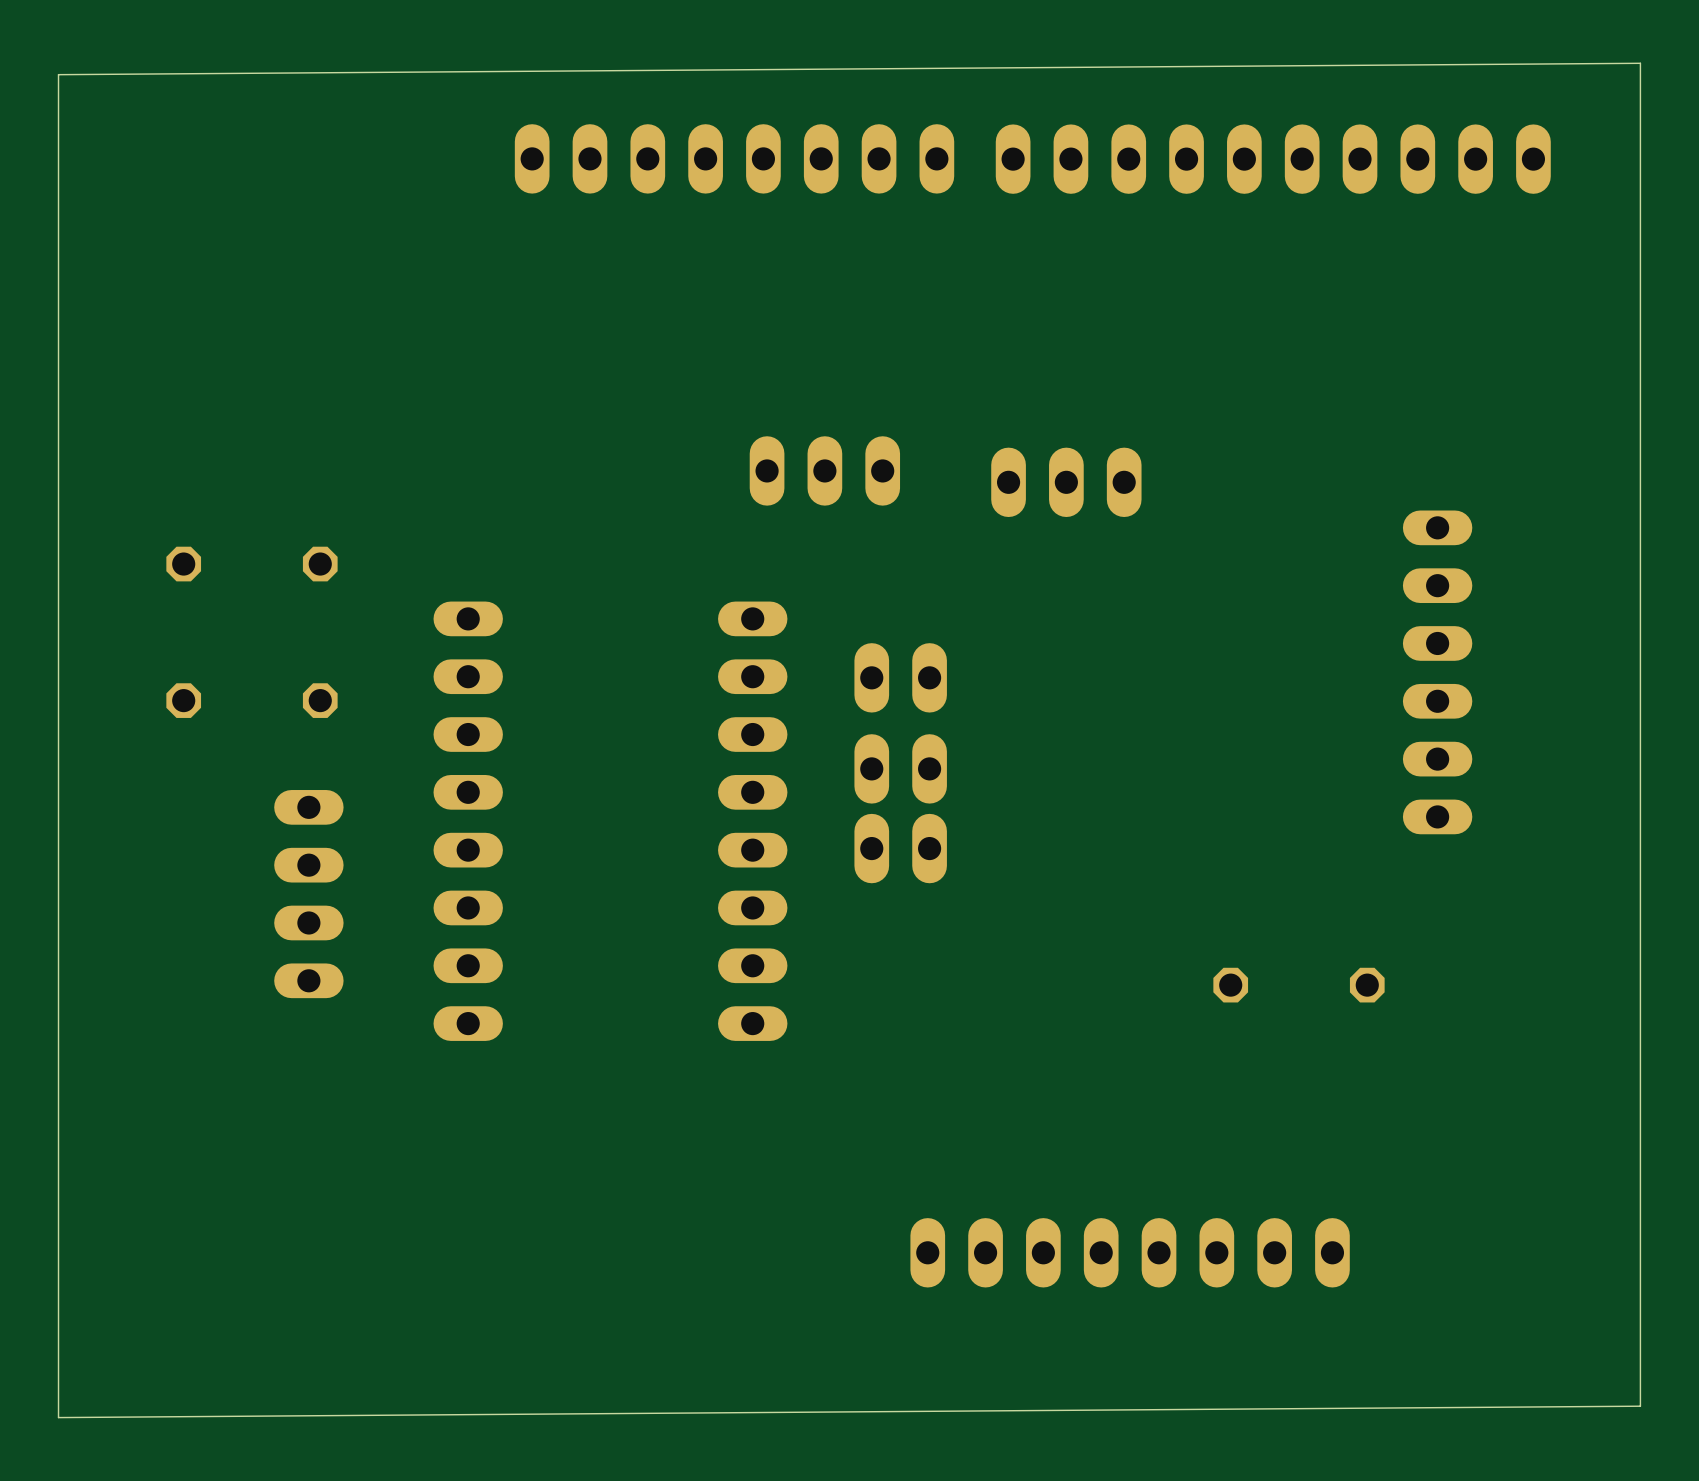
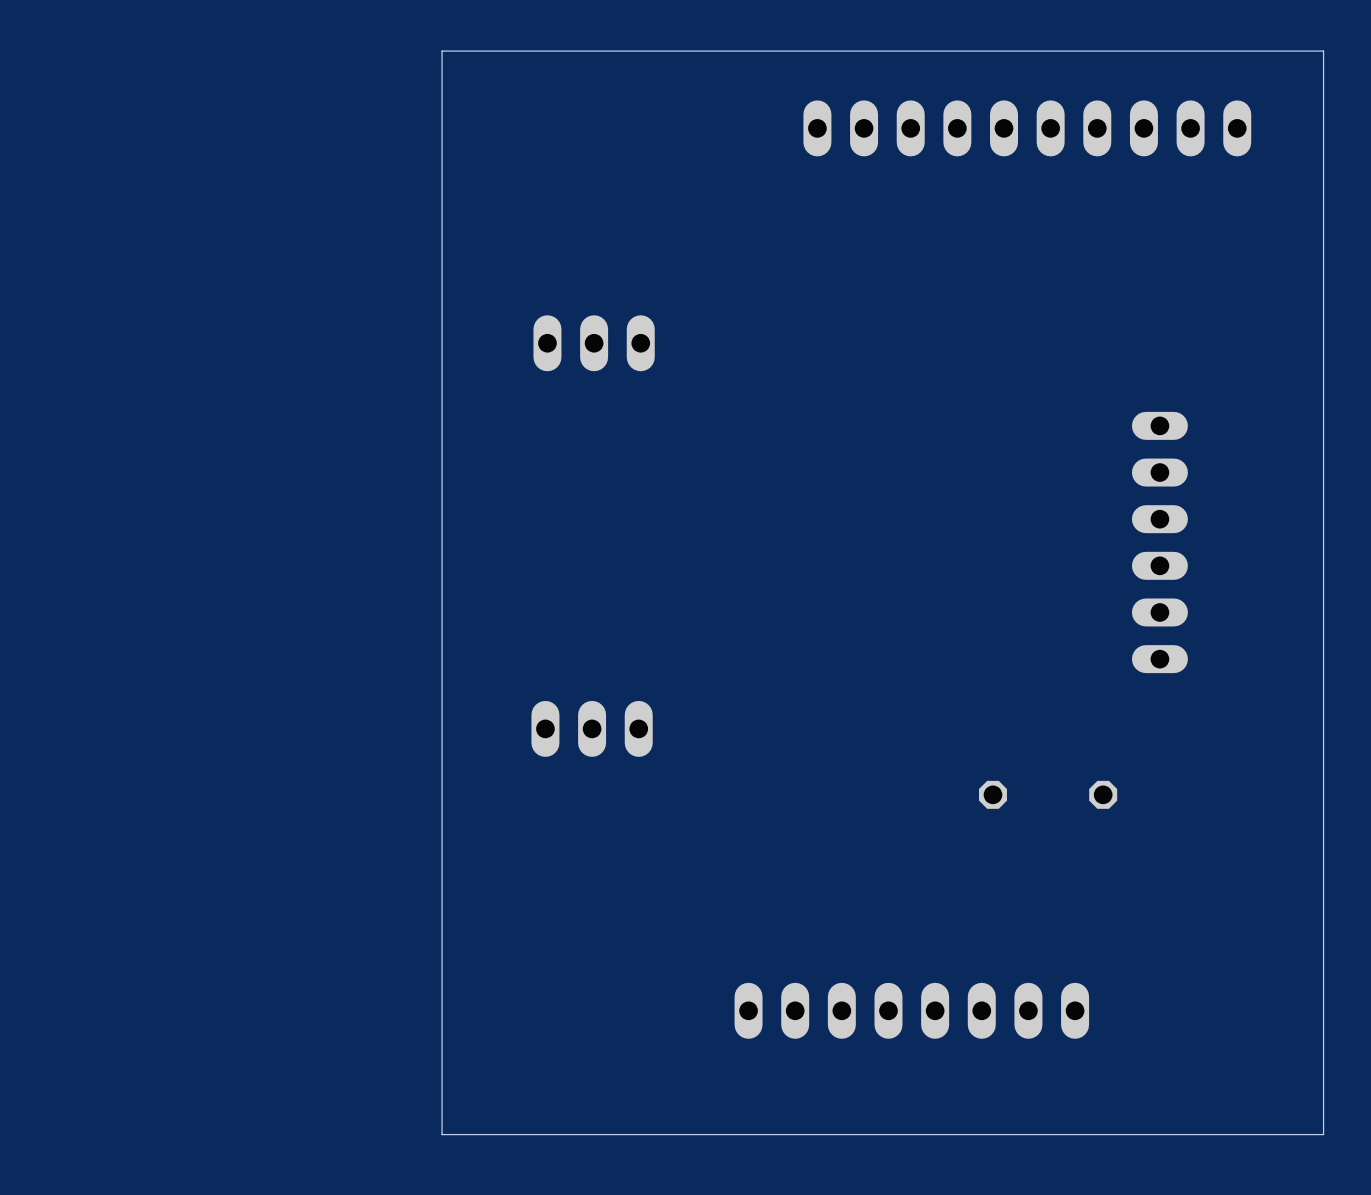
board edge: (1640, 63) (58, 74) (58, 1417) (1640, 1406) -> (1323, 51) (442, 51) (442, 1134) (1323, 1134)
part: (734, 158) -> none
part position: (824, 470) -> (594, 343)
part: (1066, 482) -> none
part: (183, 564) -> none
part: (320, 564) -> none
part: (900, 677) -> none
part: (183, 700) -> none
part: (320, 700) -> none
part: (900, 768) -> none
part: (468, 821) -> none
part: (752, 821) -> none
part: (900, 848) -> none
part: (308, 894) -> none
part: none -> (592, 728)

